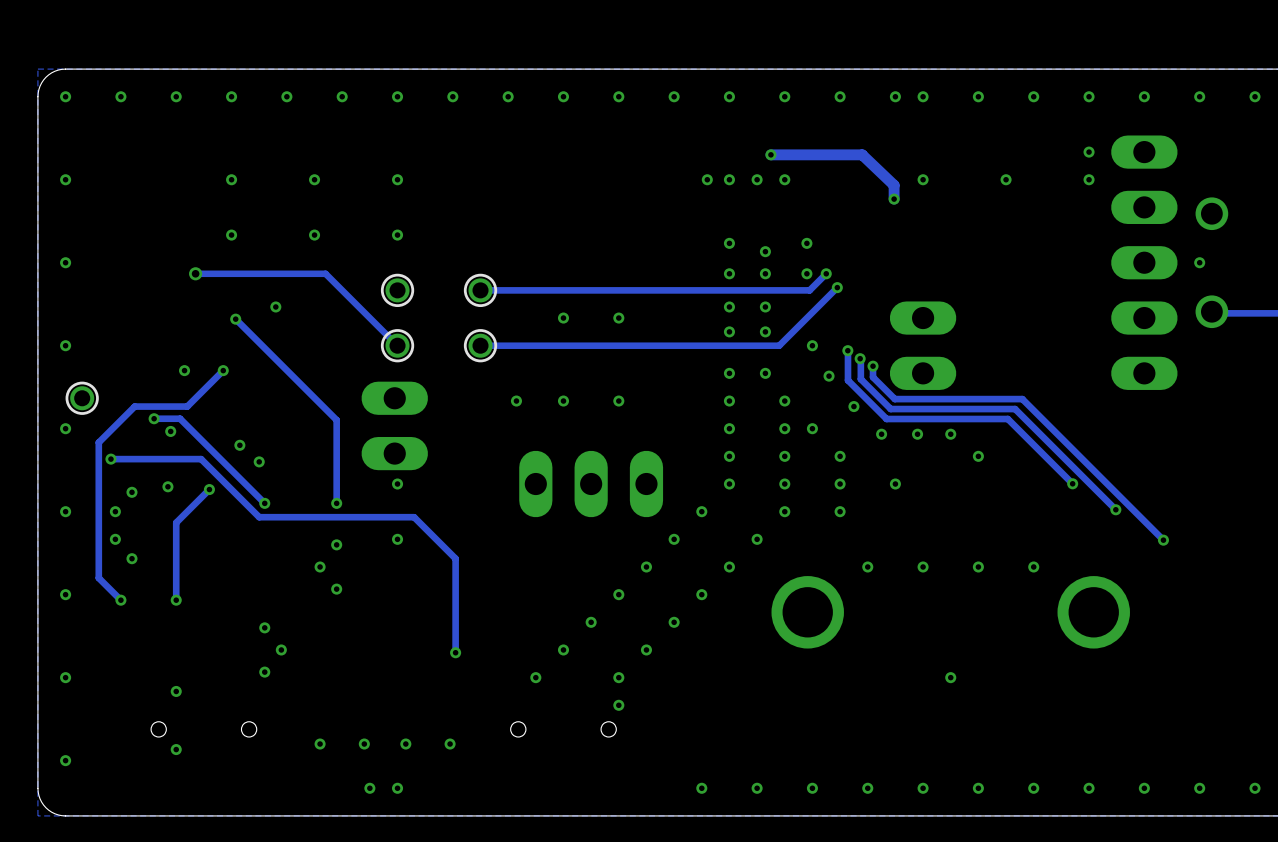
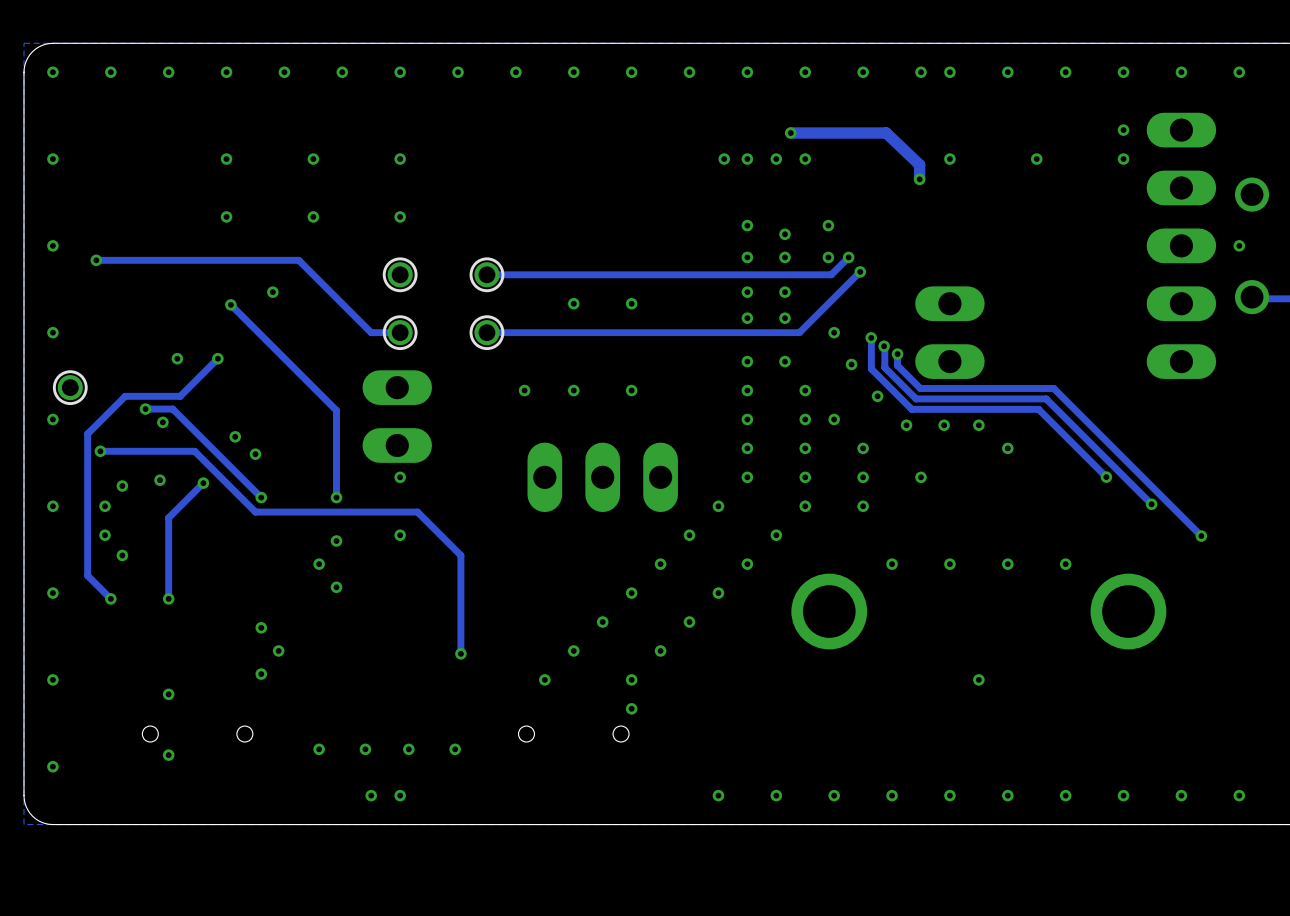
track: (195, 273) (325, 273) (397, 345) -> (96, 260) (298, 260) (371, 332) (400, 332)
via: (195, 273) -> none
via: none -> (96, 260)

